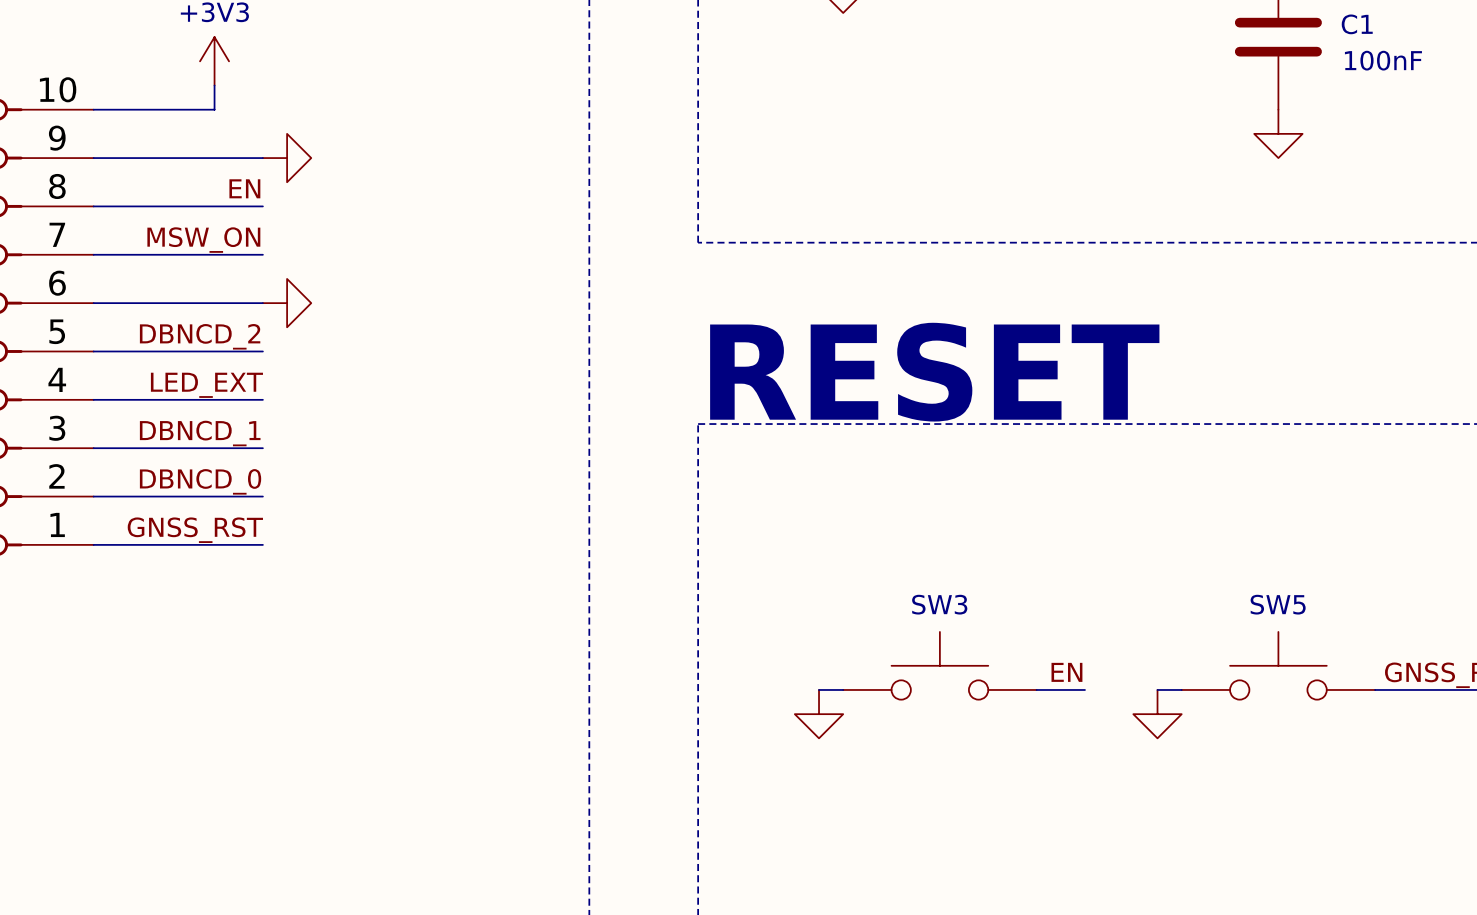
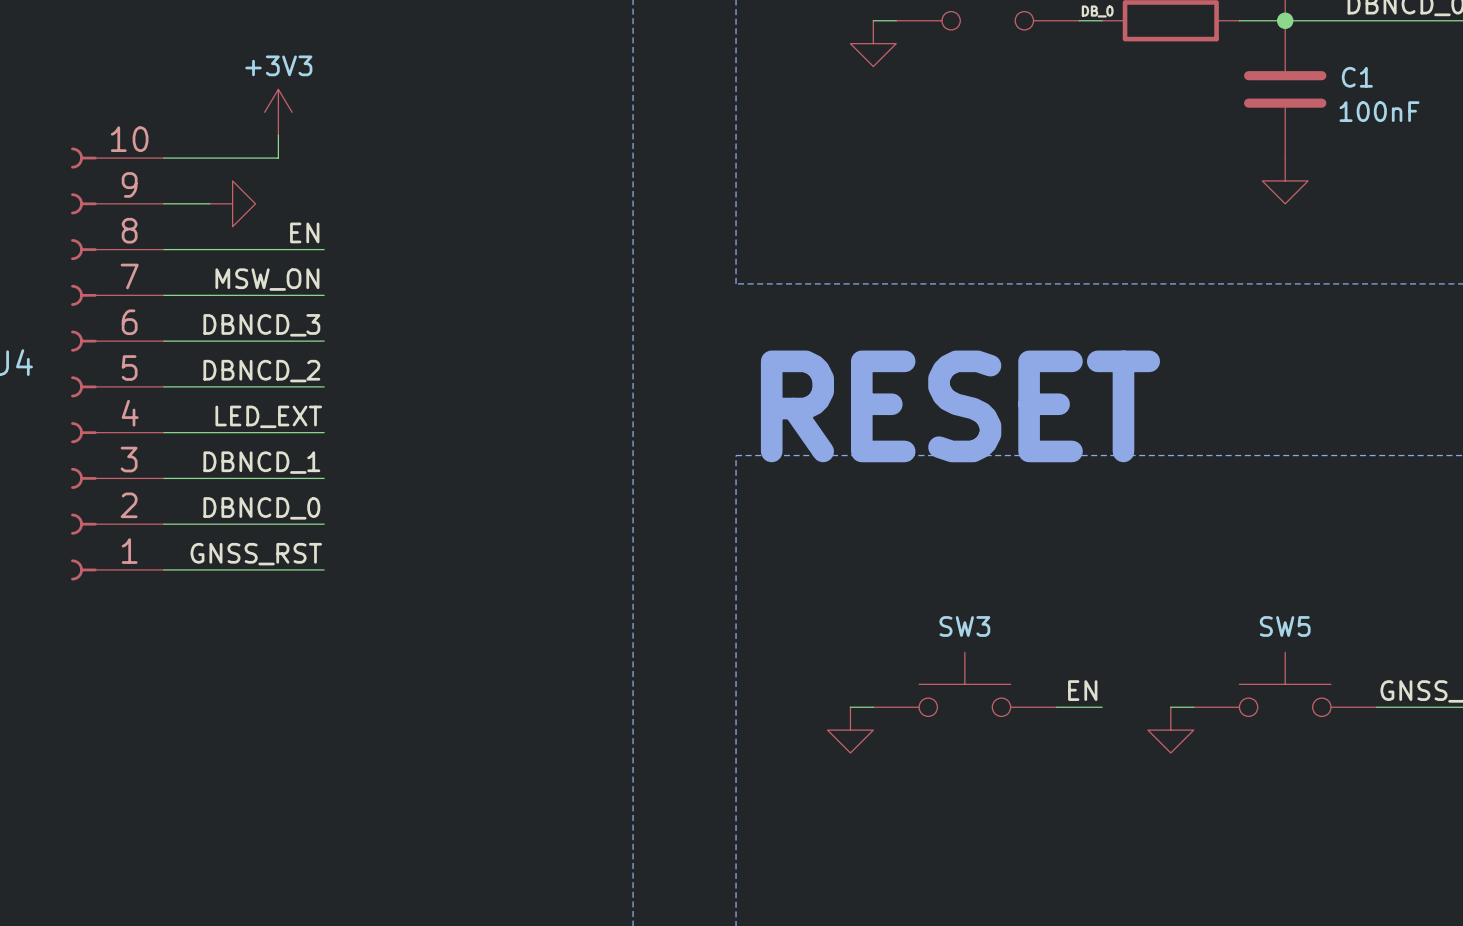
wire: (142, 158) (262, 158) -> none
power symbol: none -> (232, 203)
power symbol: (287, 158) -> none
label: none -> DBNCD_3 (261, 325)
power symbol: (287, 303) -> none

